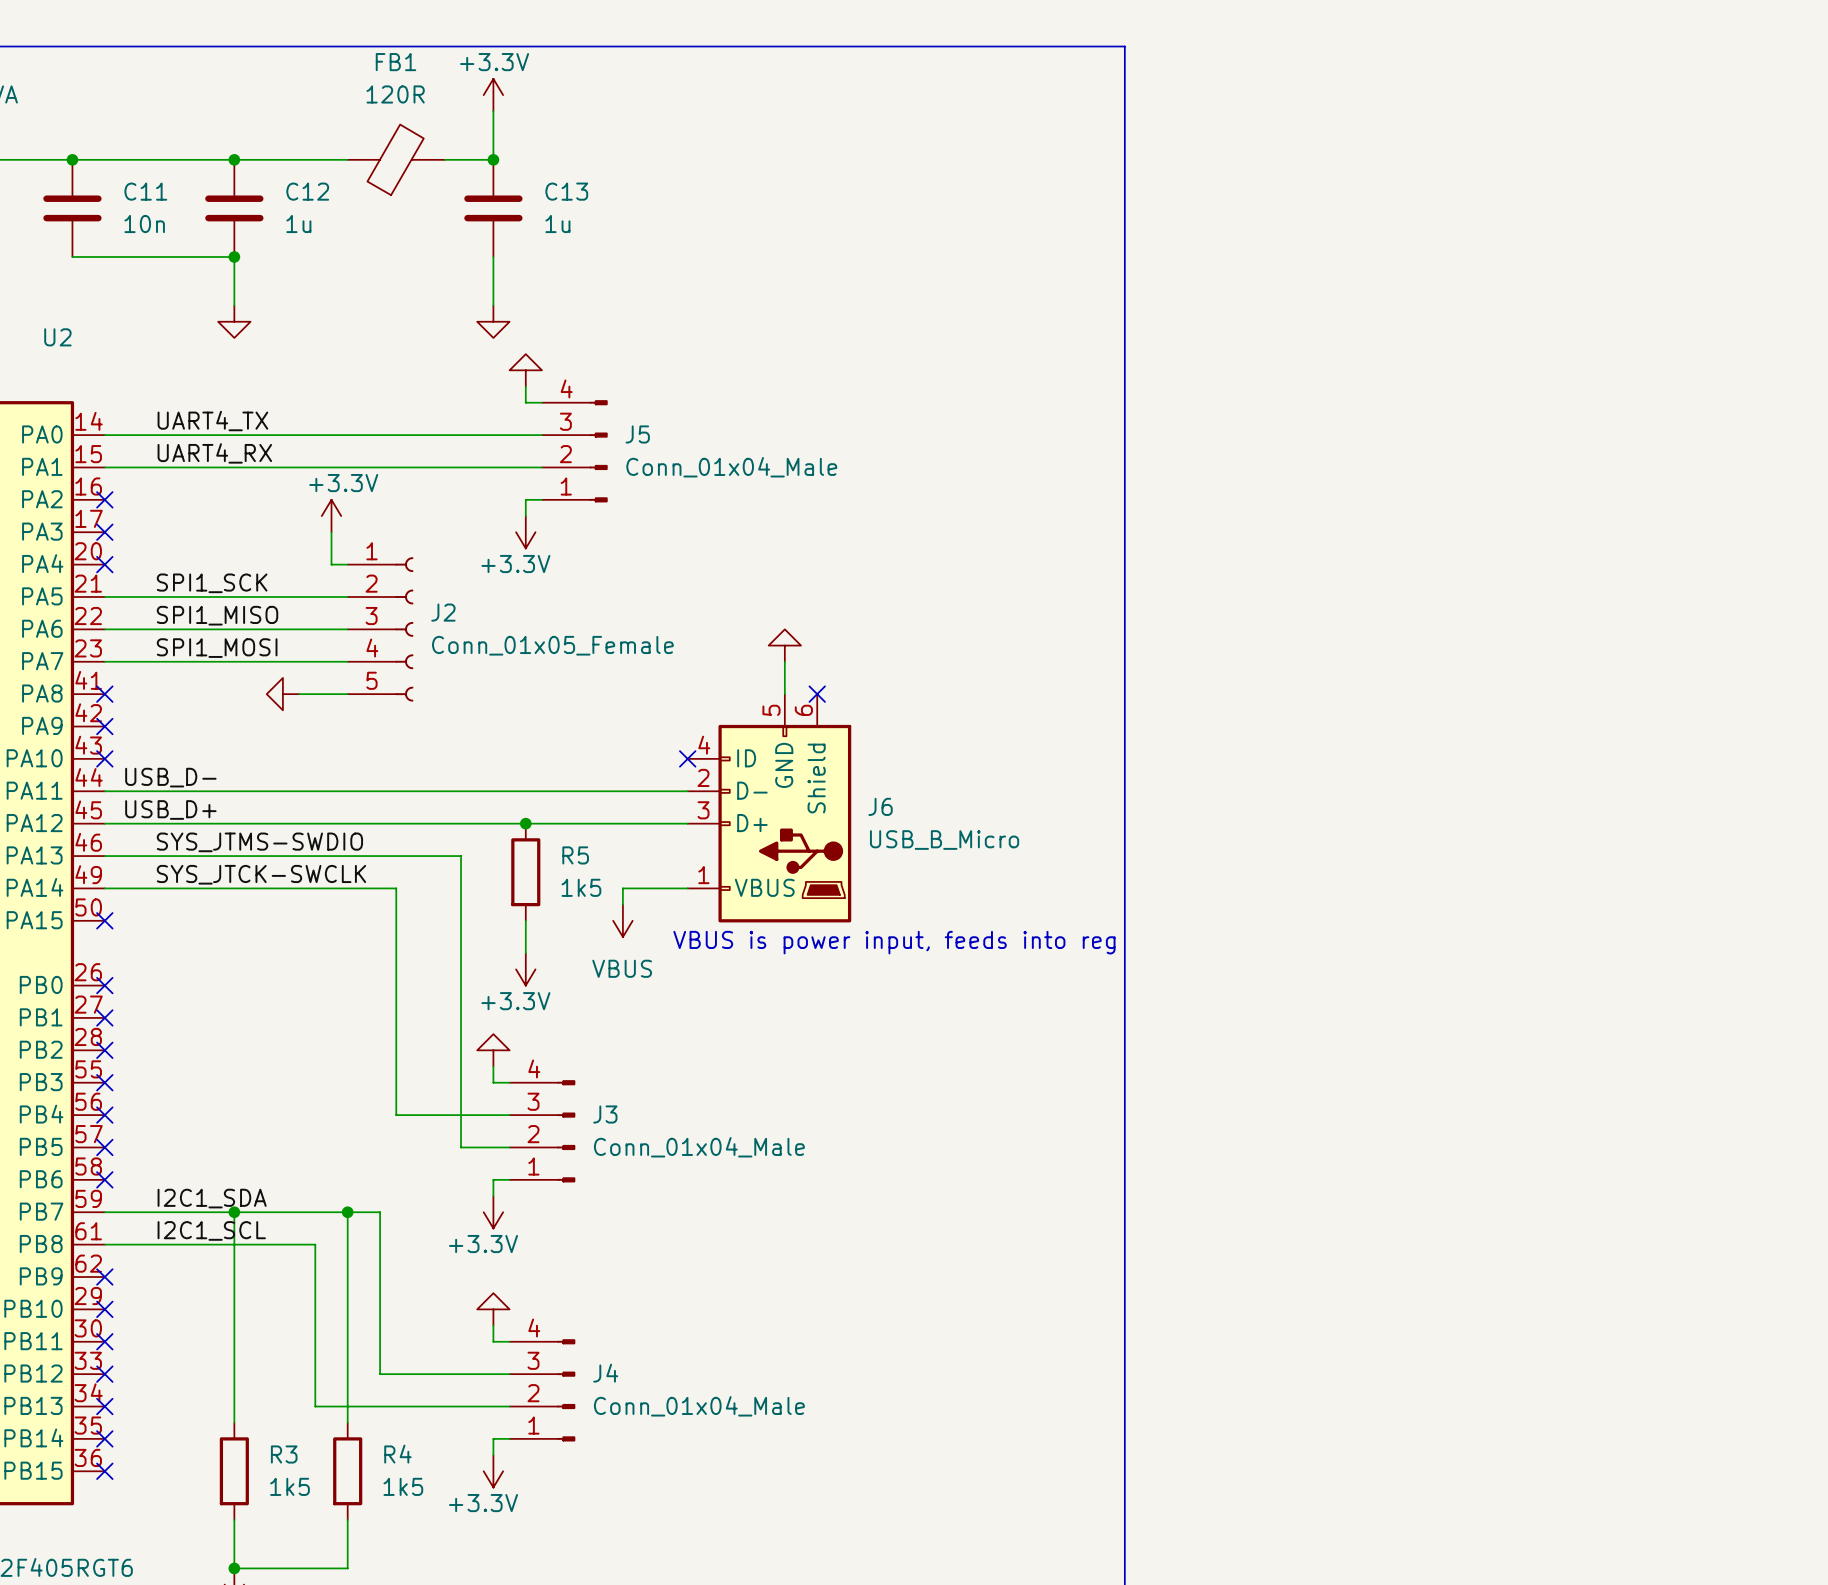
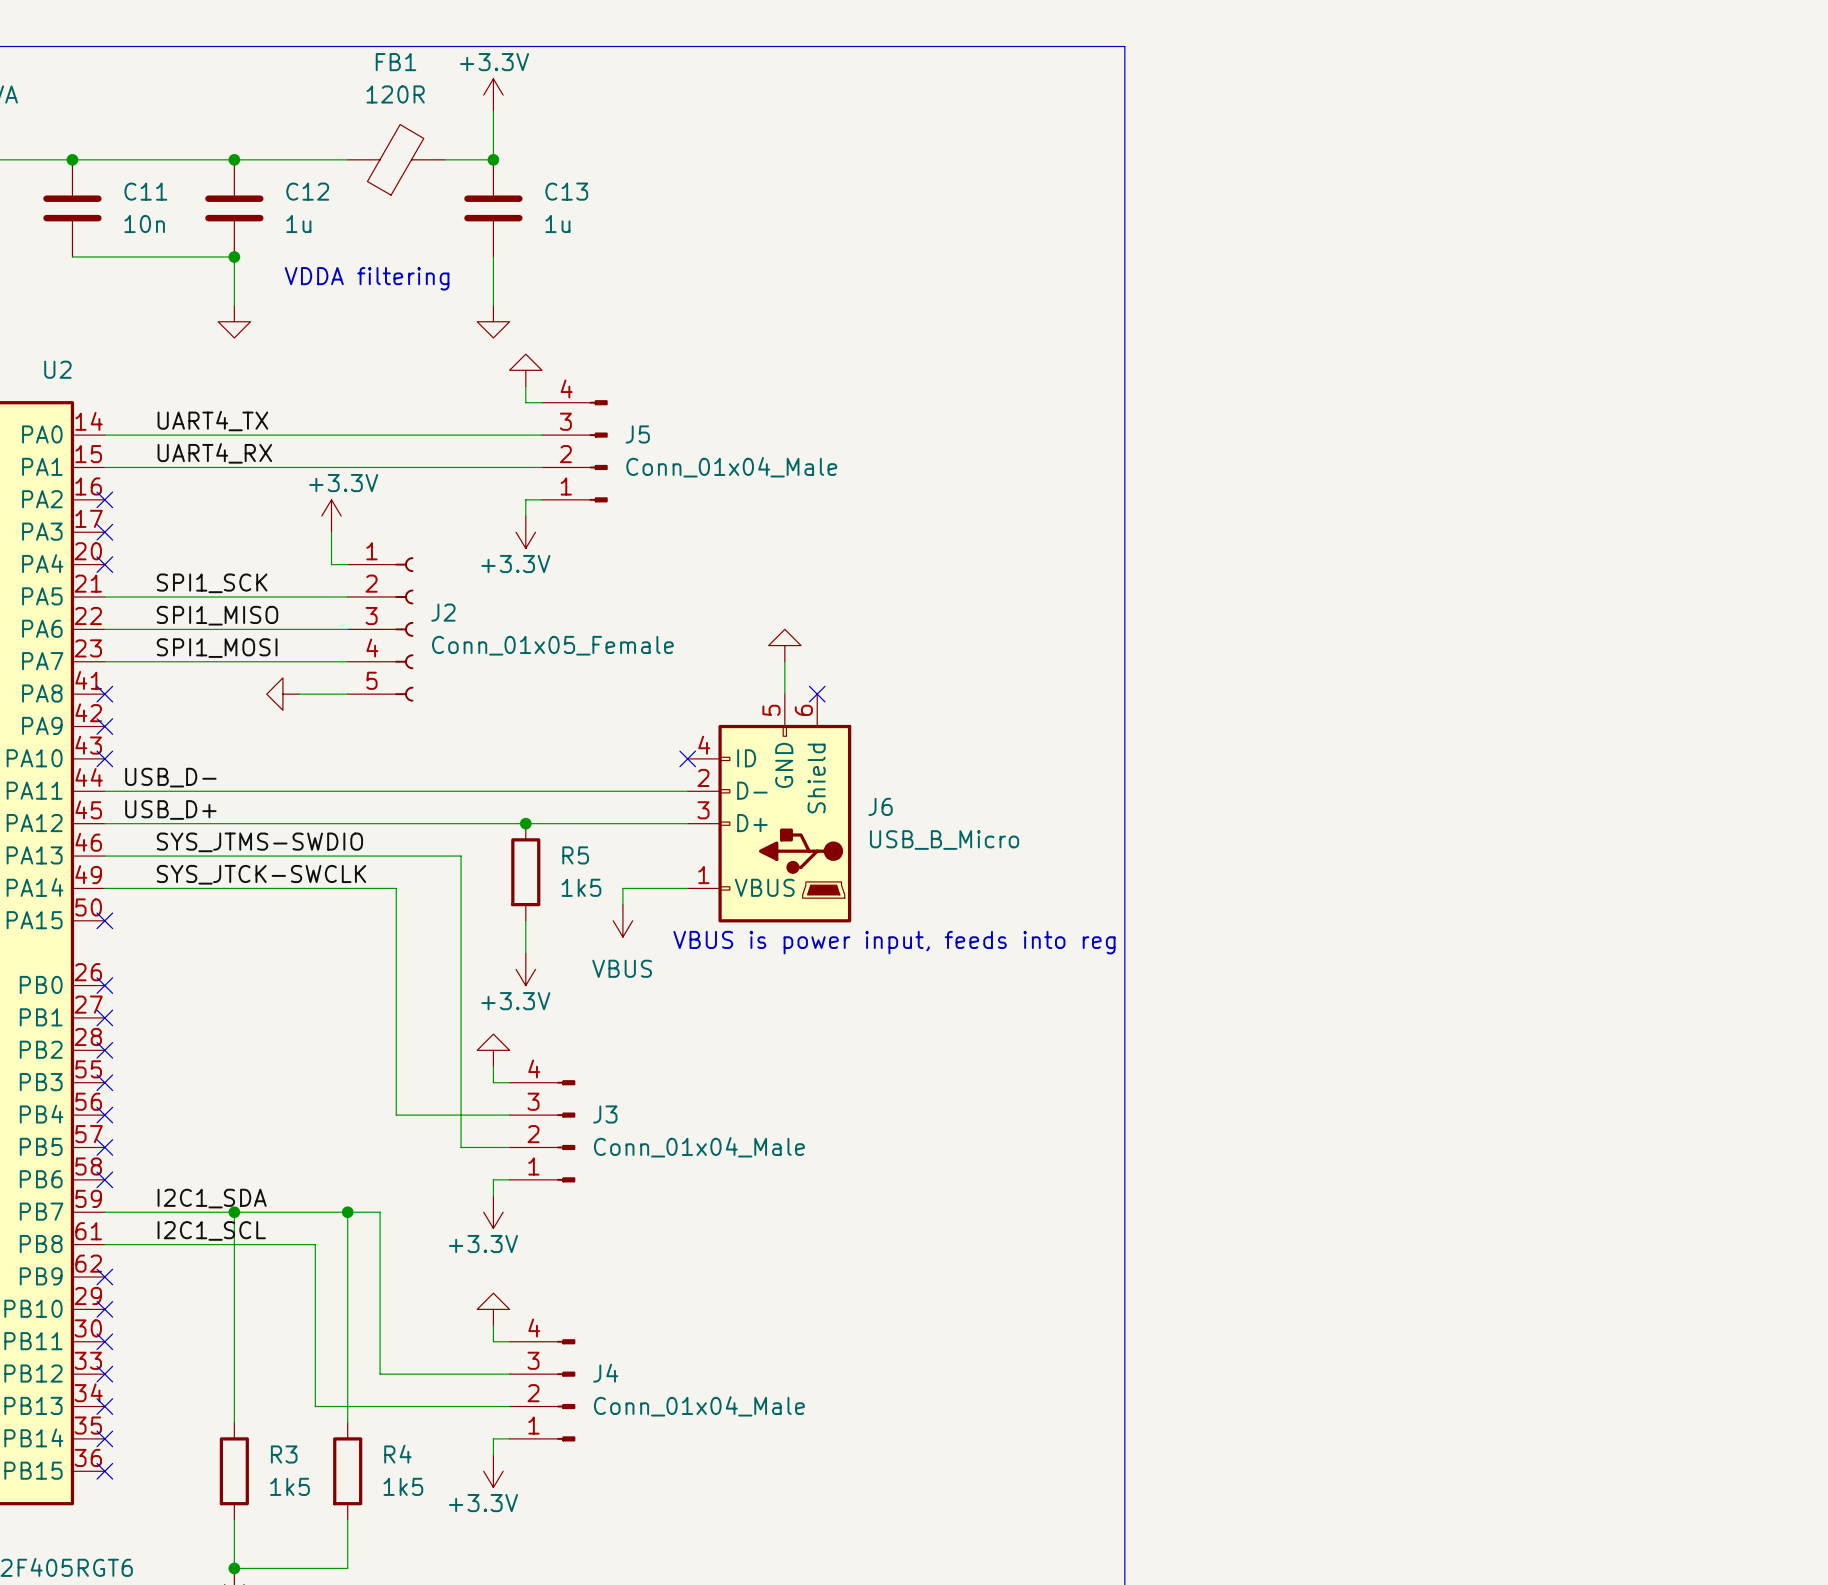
text: none -> VDDA filtering (367, 278)
U2 name position: U2 (57, 337) -> U2 (57, 369)

